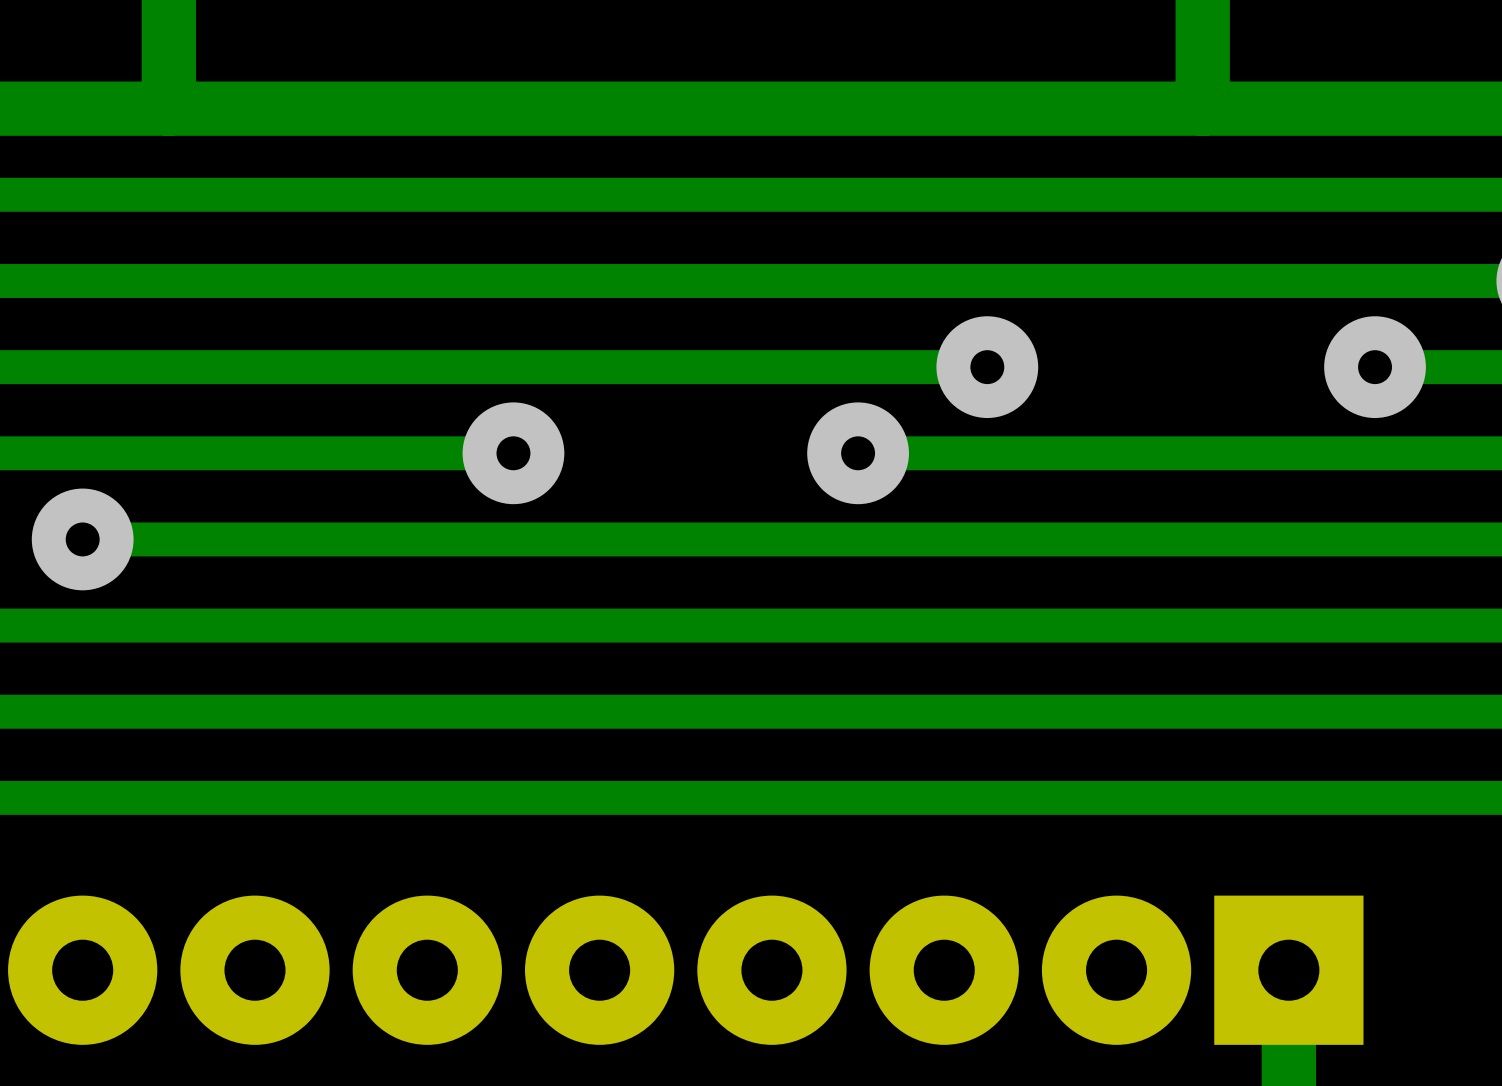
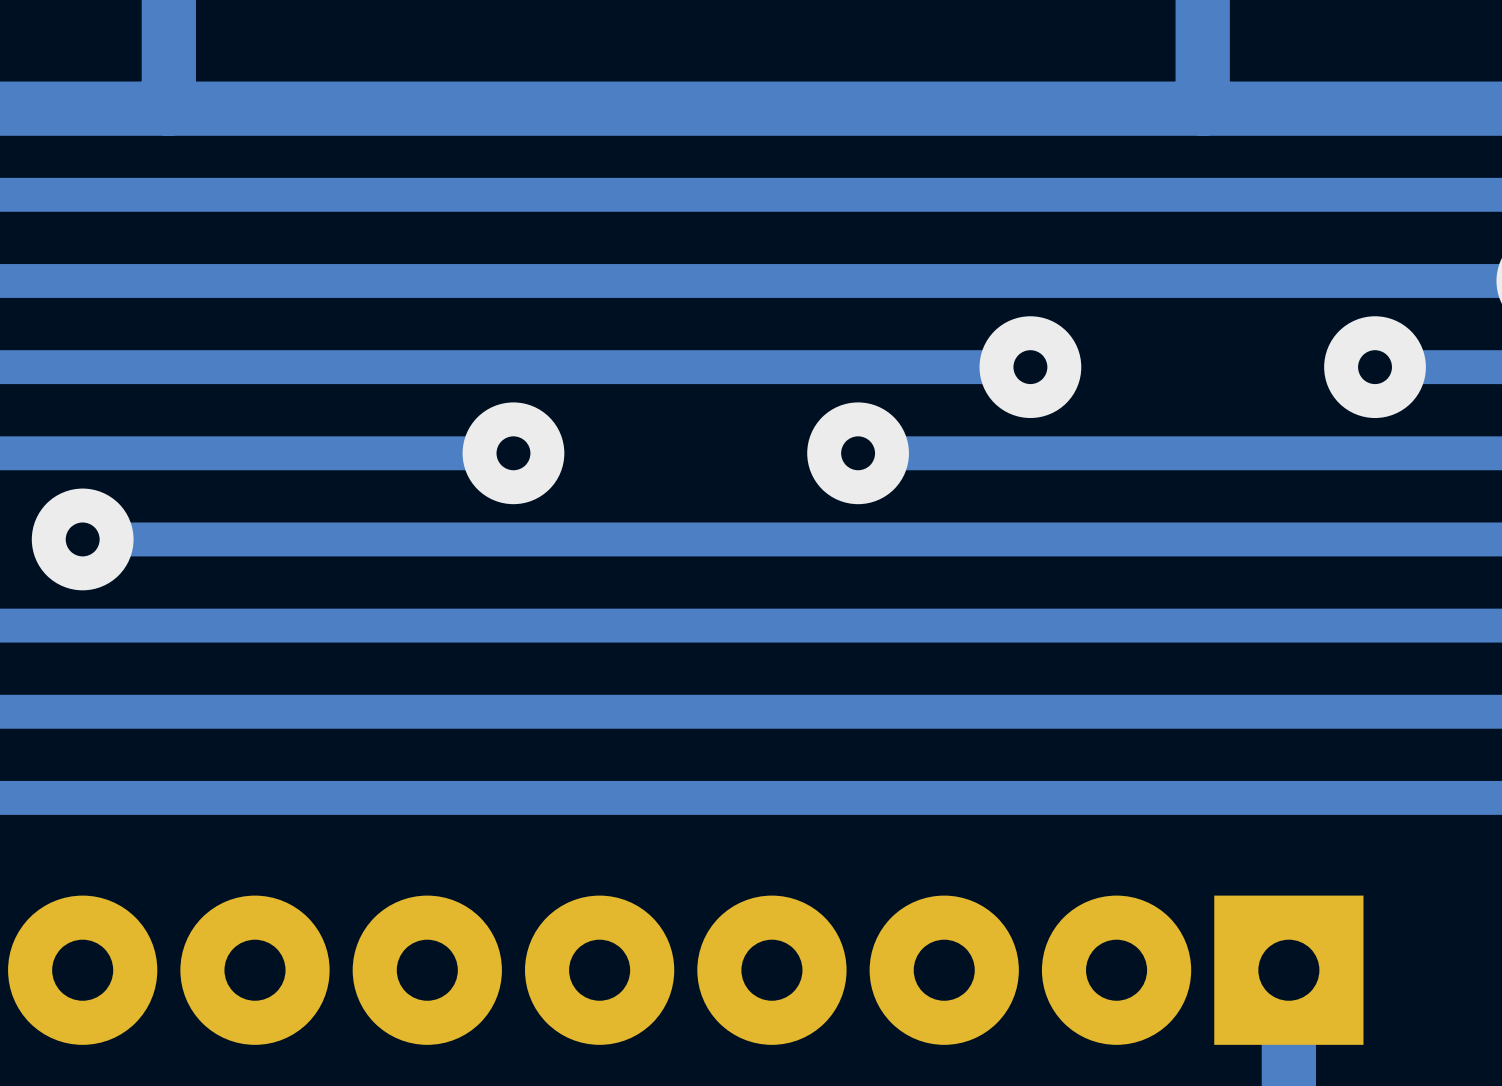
via position: (987, 367) -> (1030, 367)

